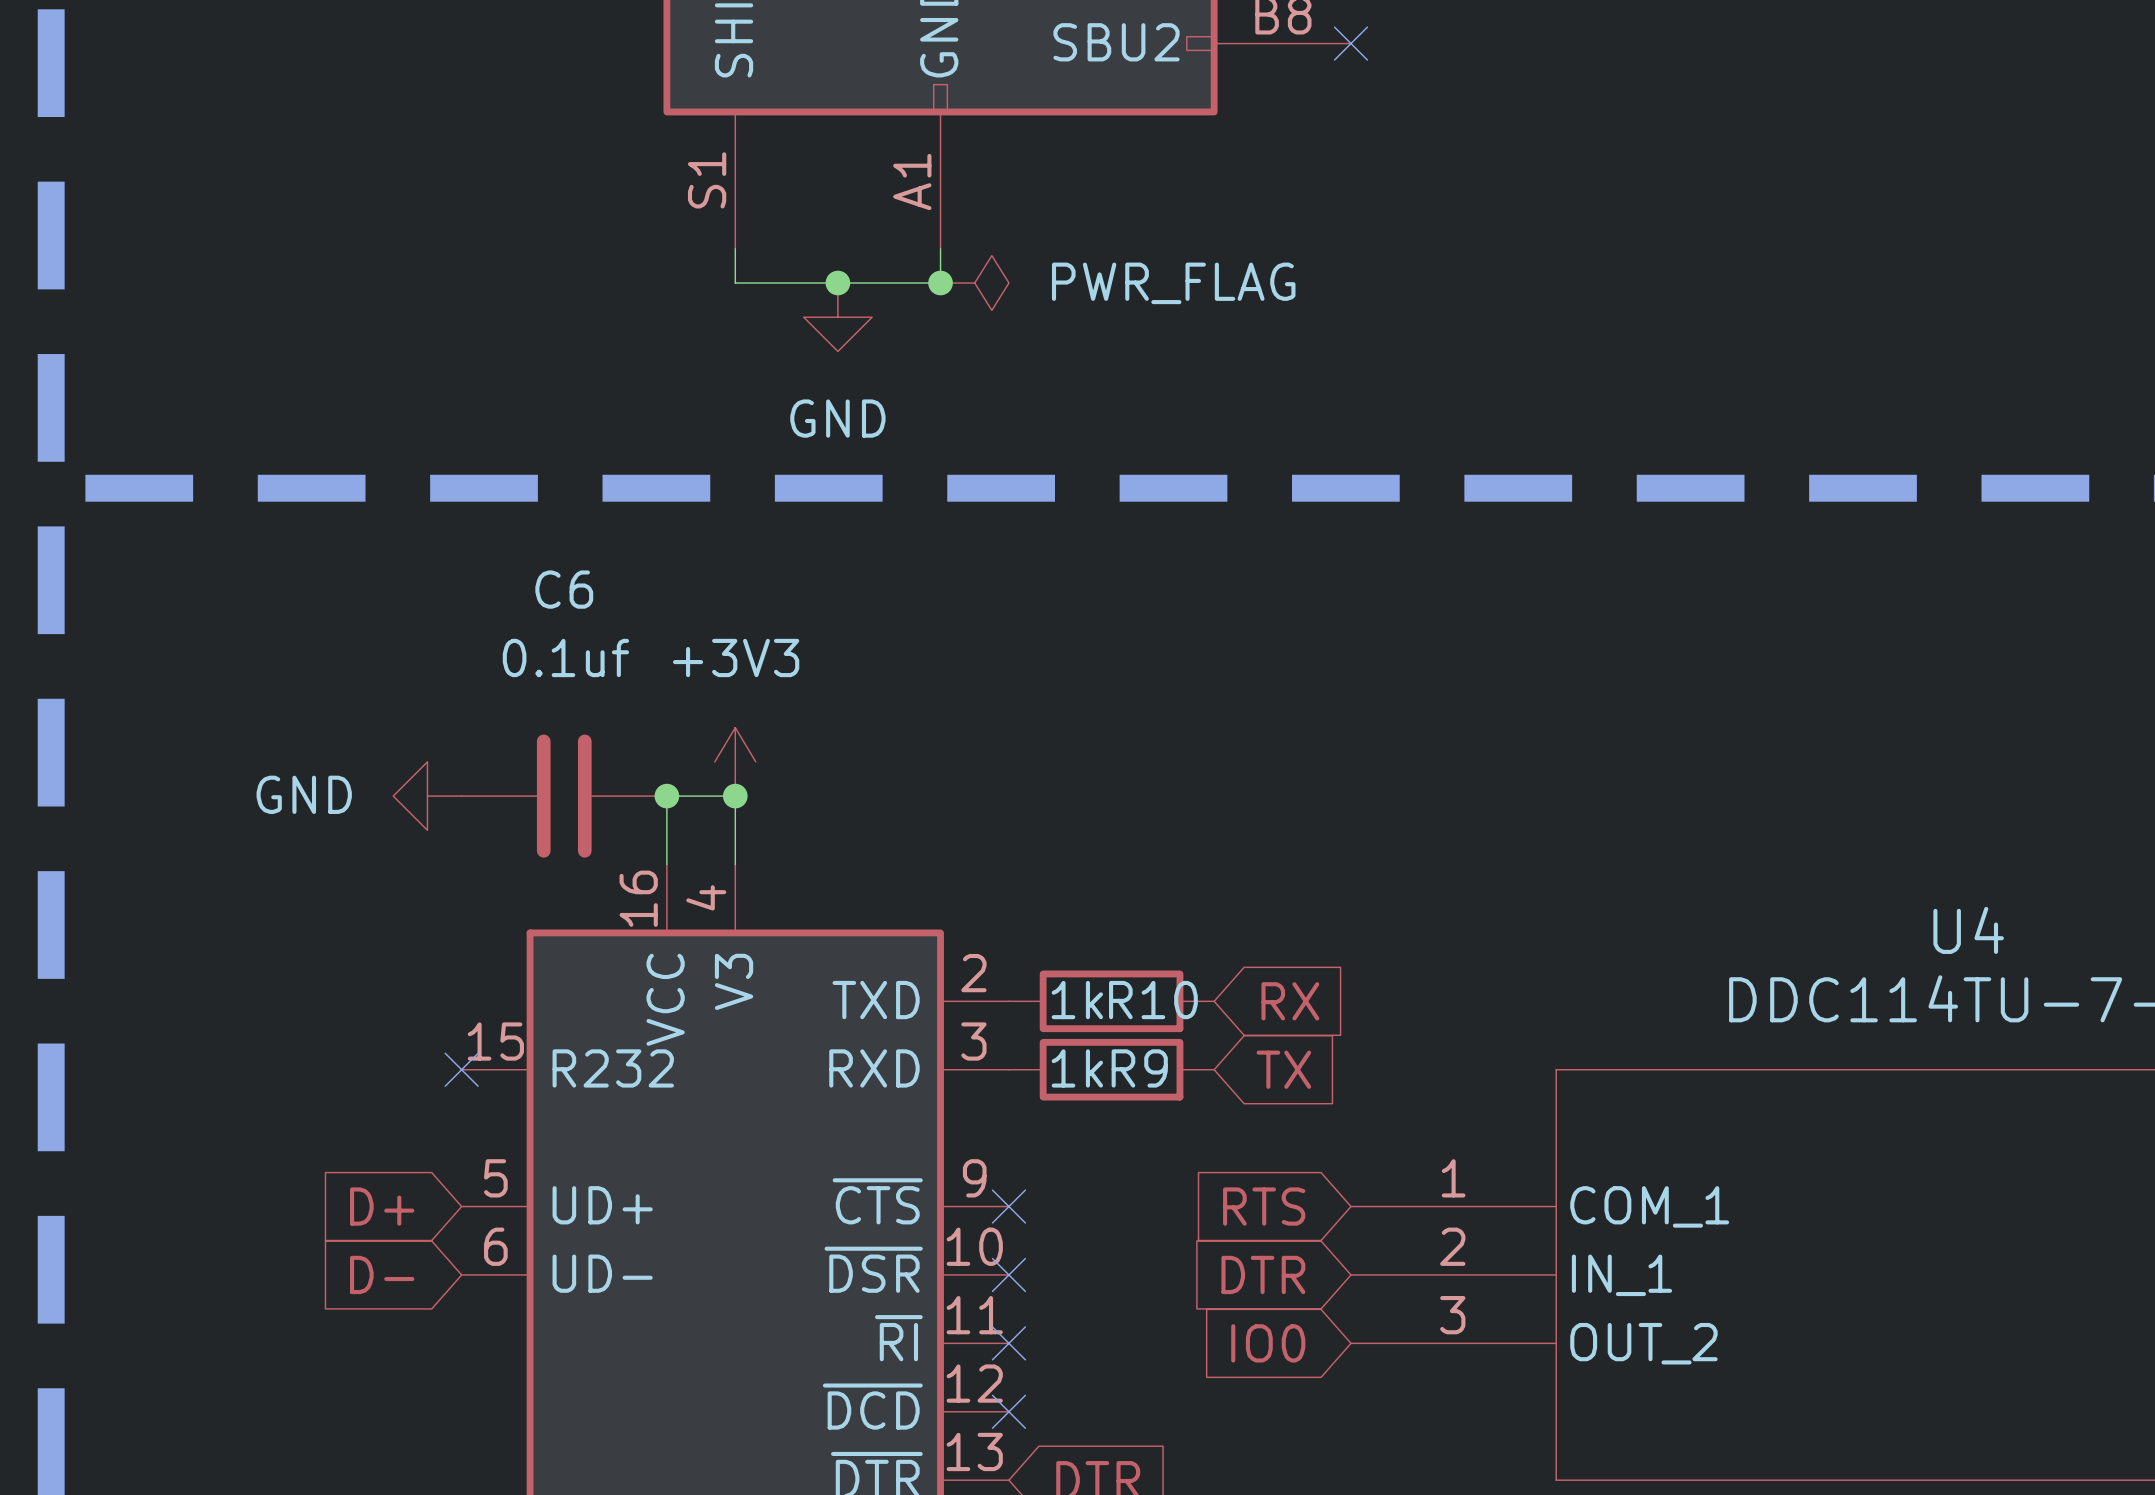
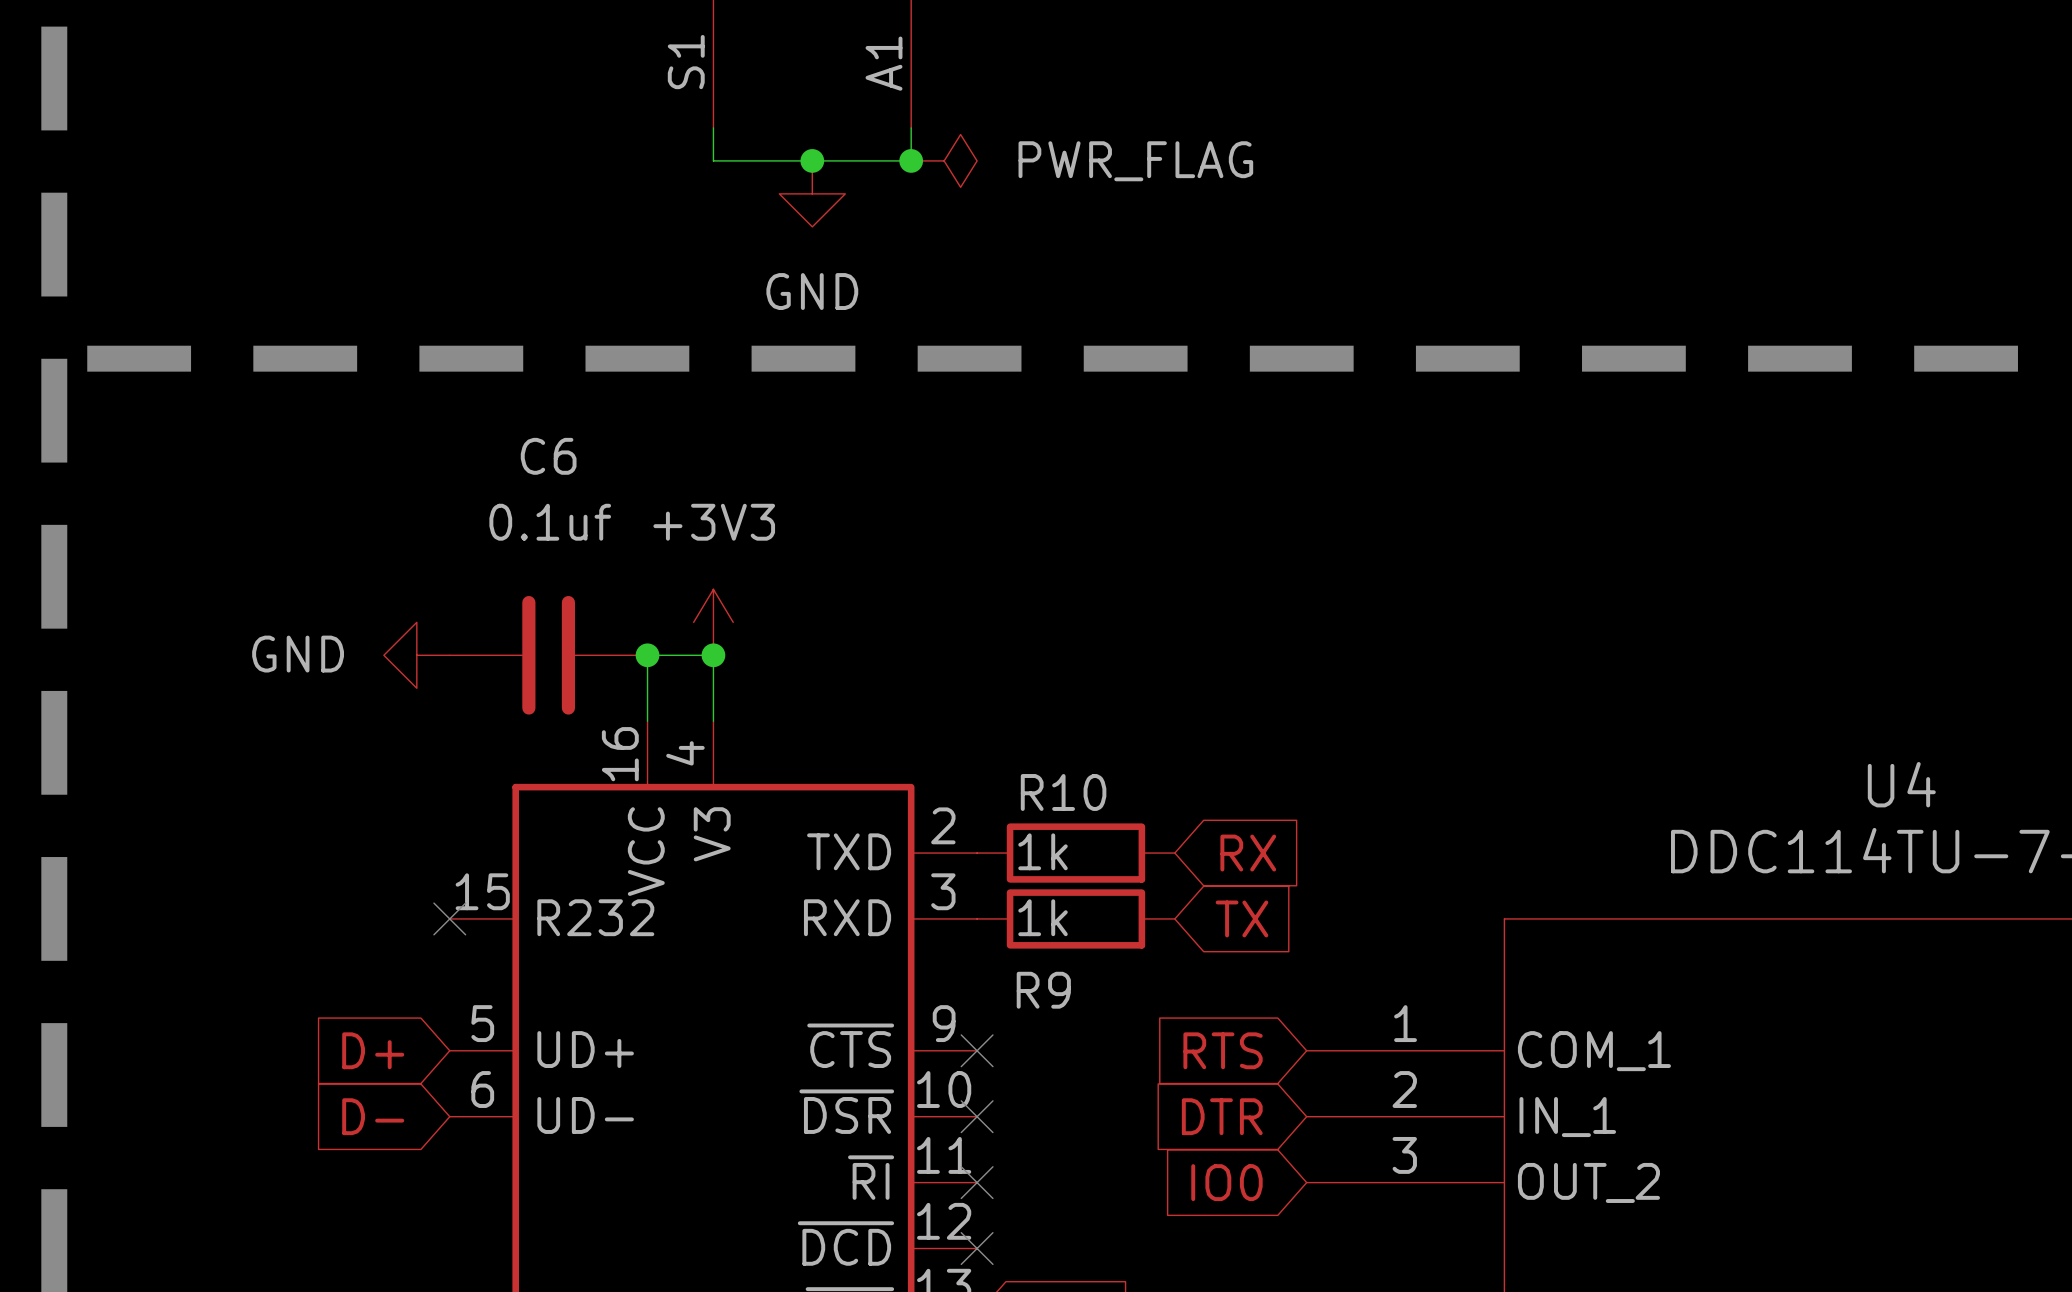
R10 name position: R10 (1153, 1000) -> R10 (1063, 792)
R9 name position: R9 (1139, 1068) -> R9 (1043, 990)

